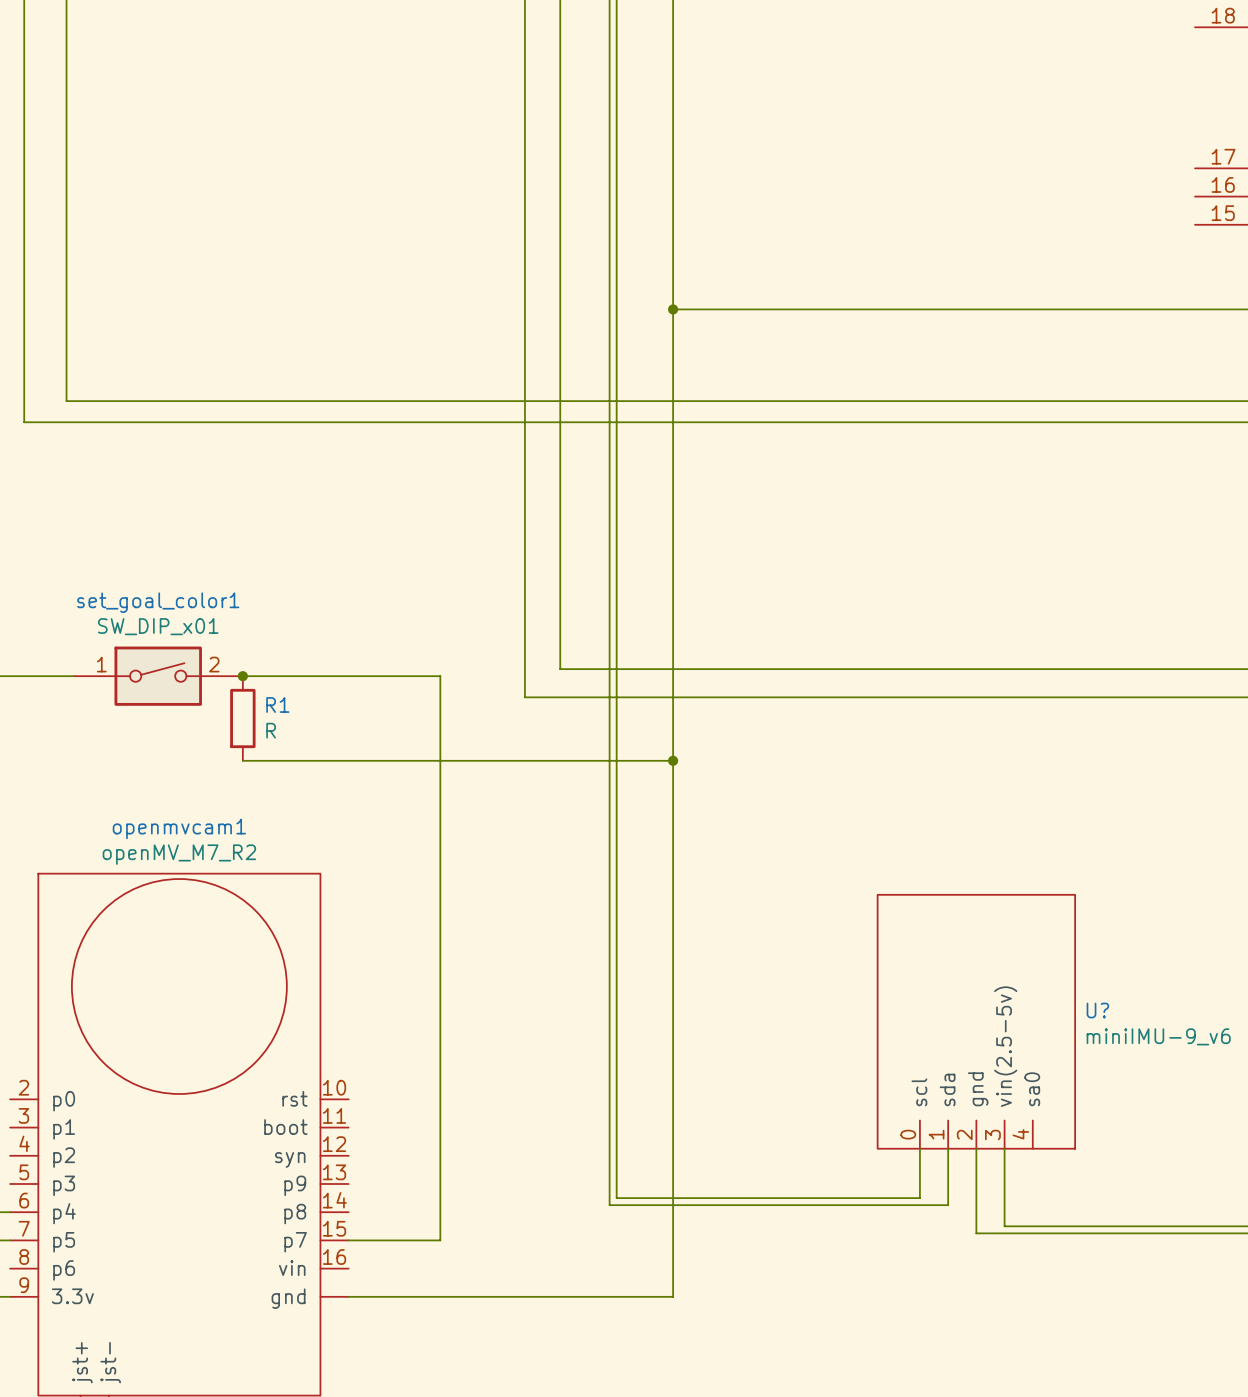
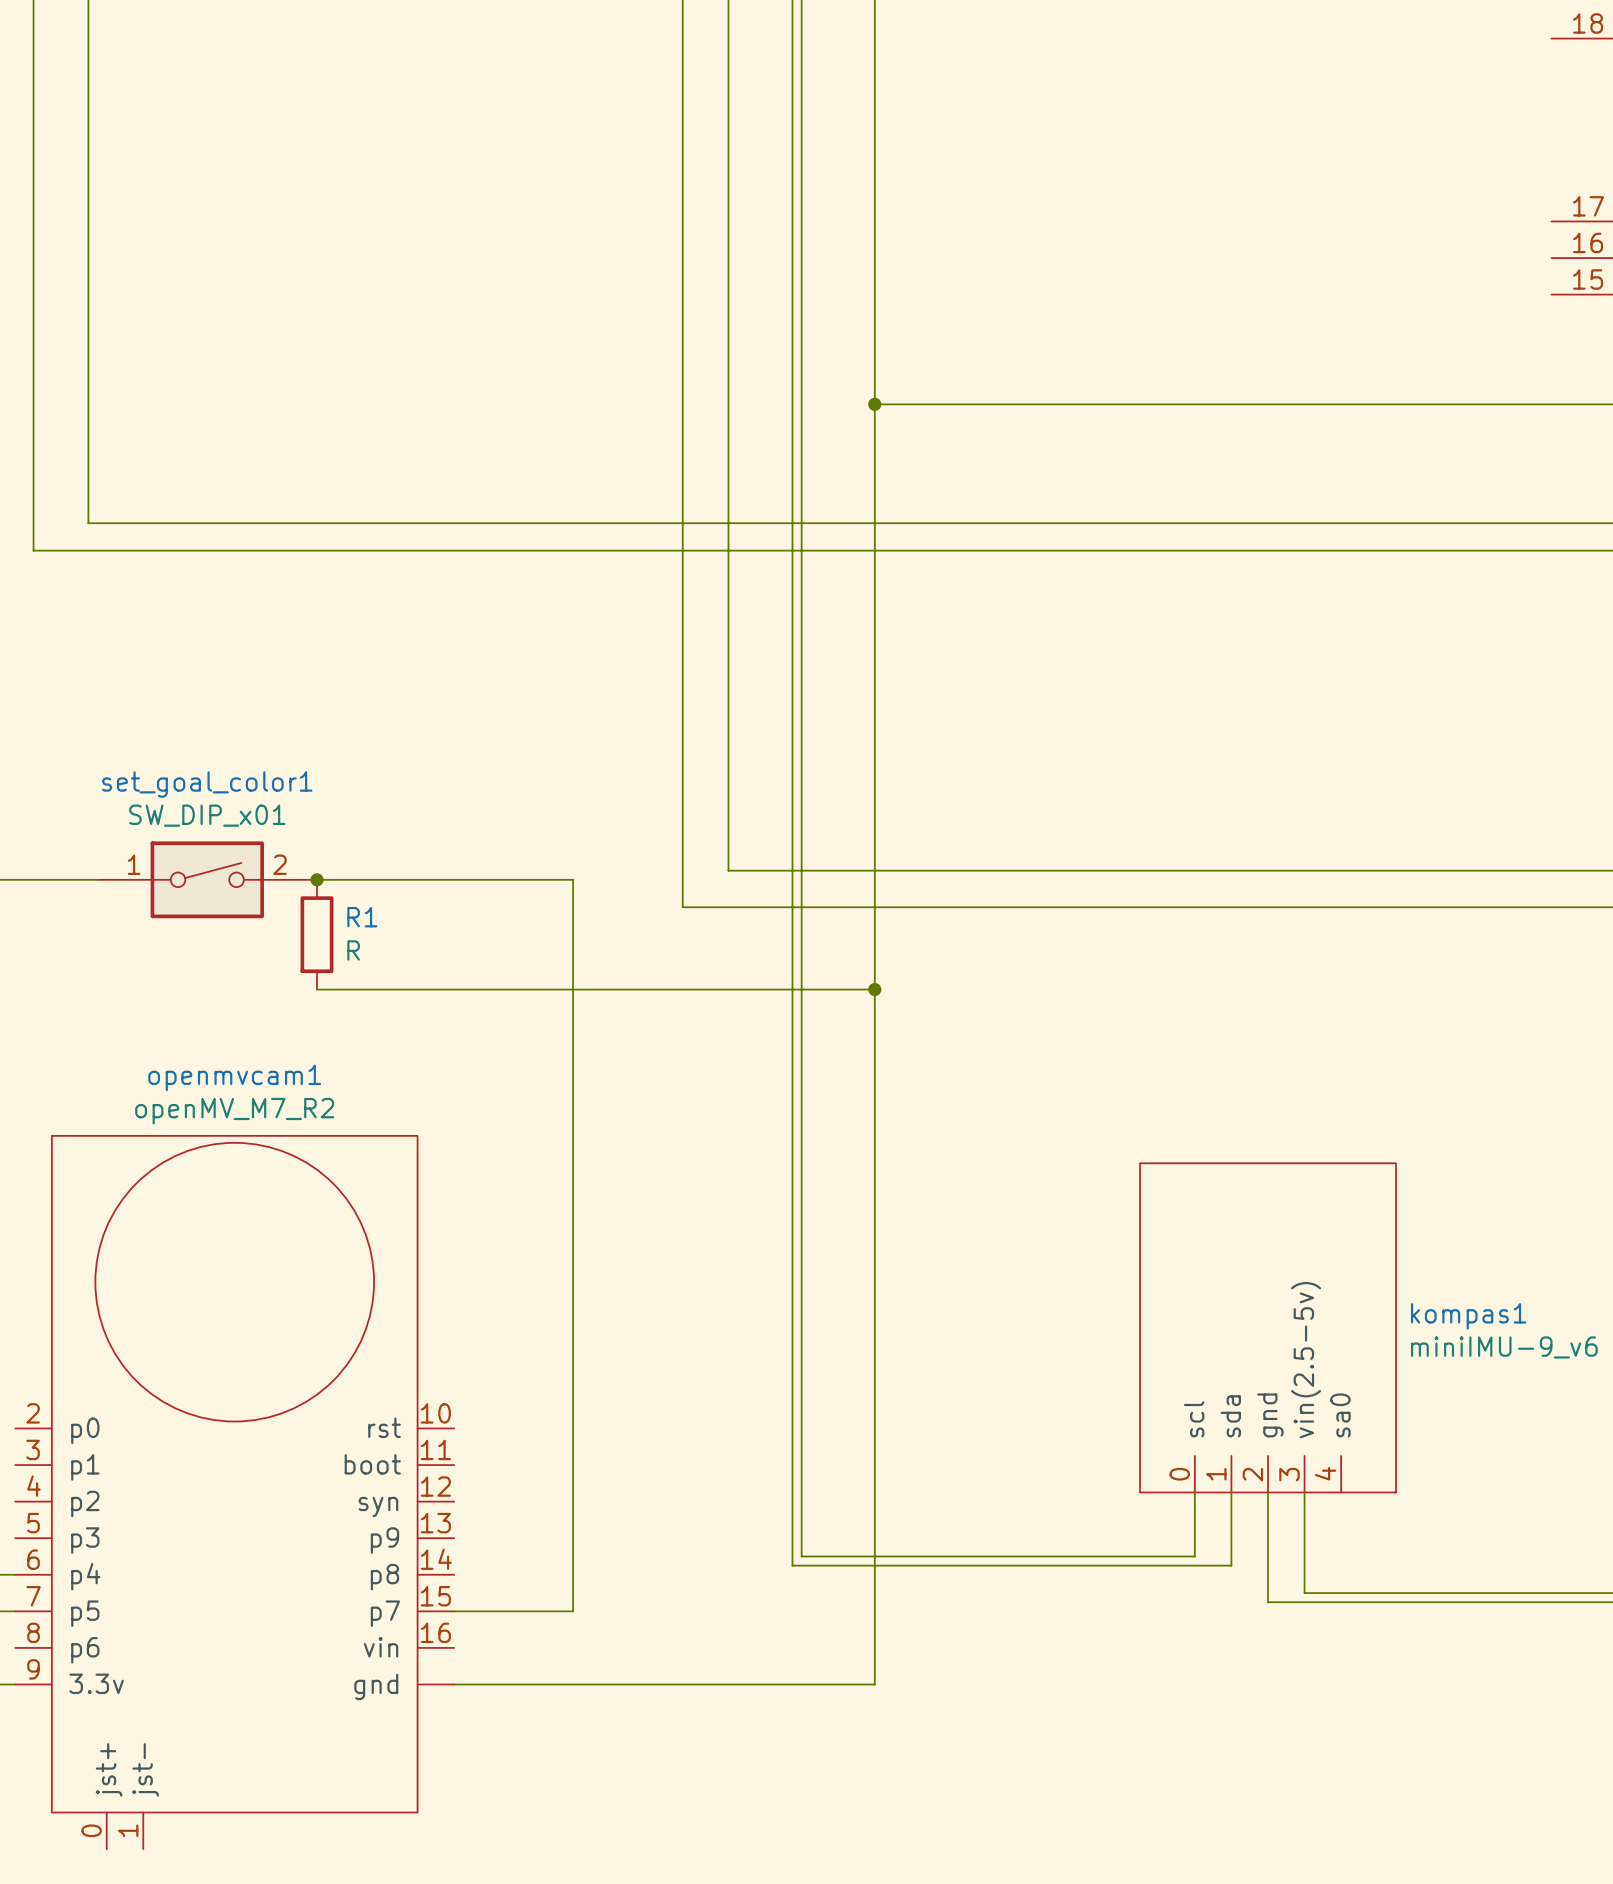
U? name: U? (1097, 1010) -> kompas1 (1468, 1316)

